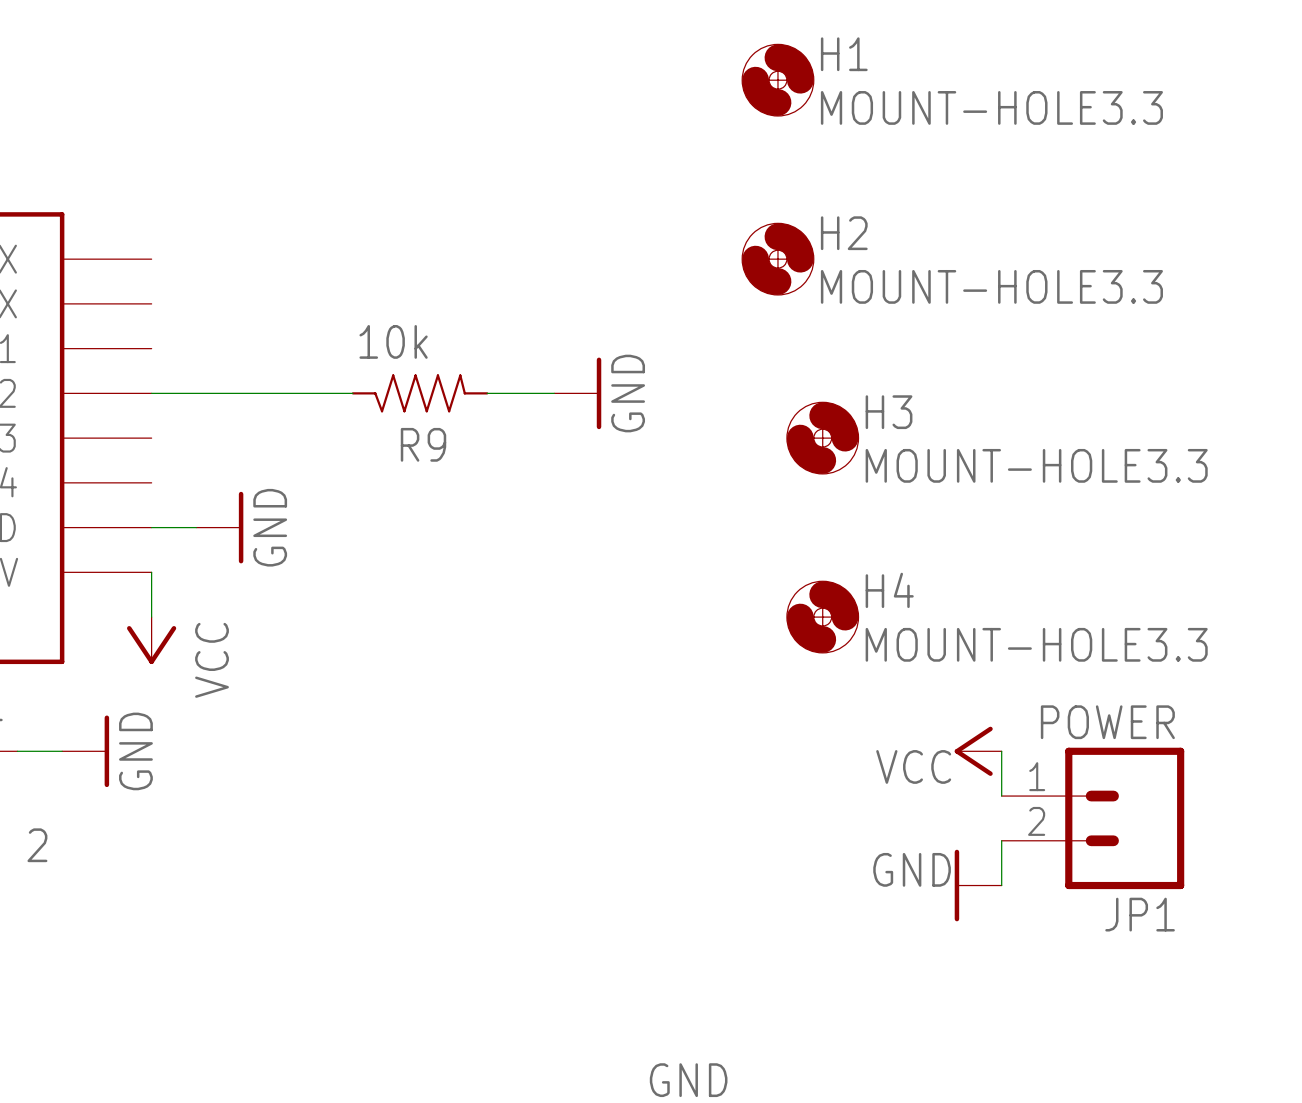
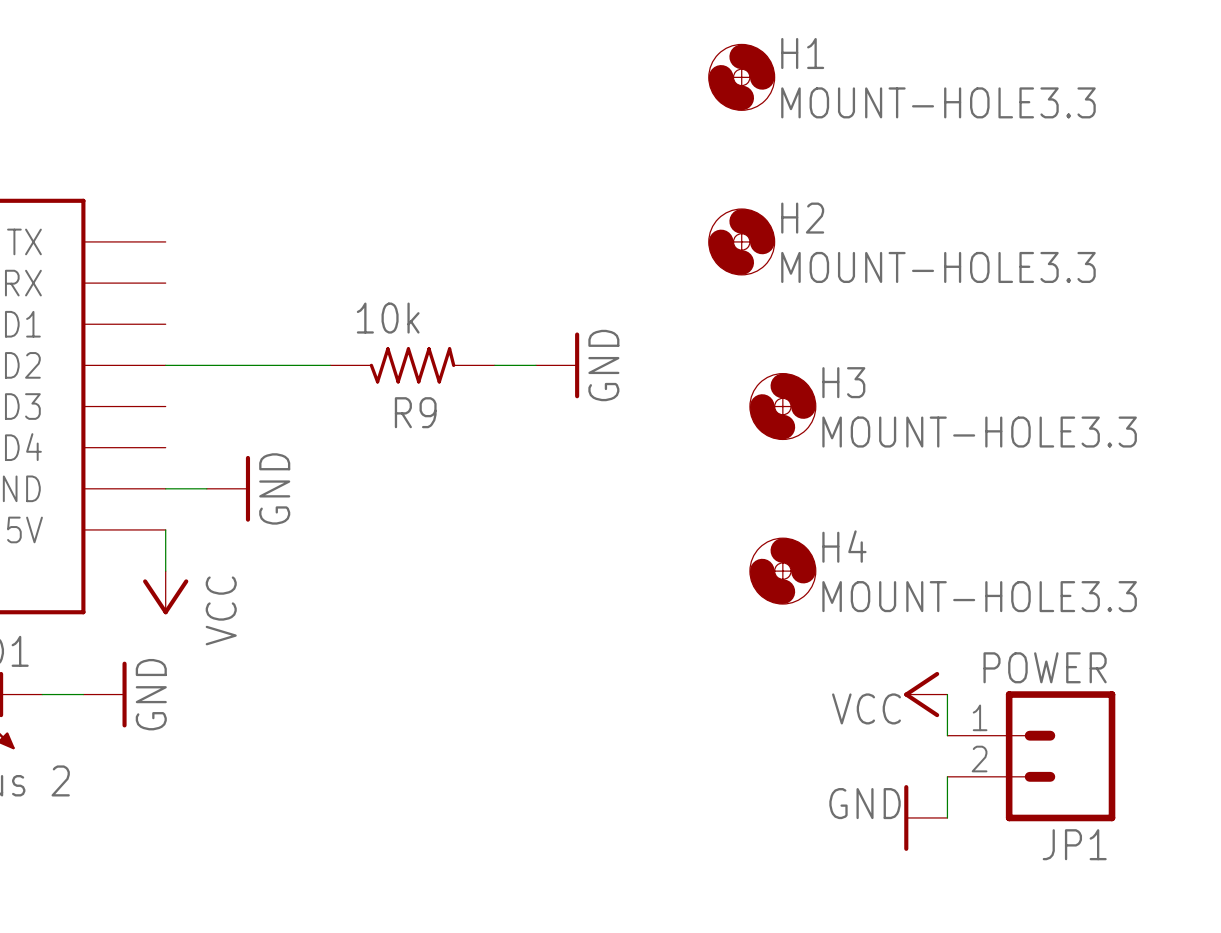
R9 symbol: [351, 374, 489, 413] -> [330, 347, 495, 384]

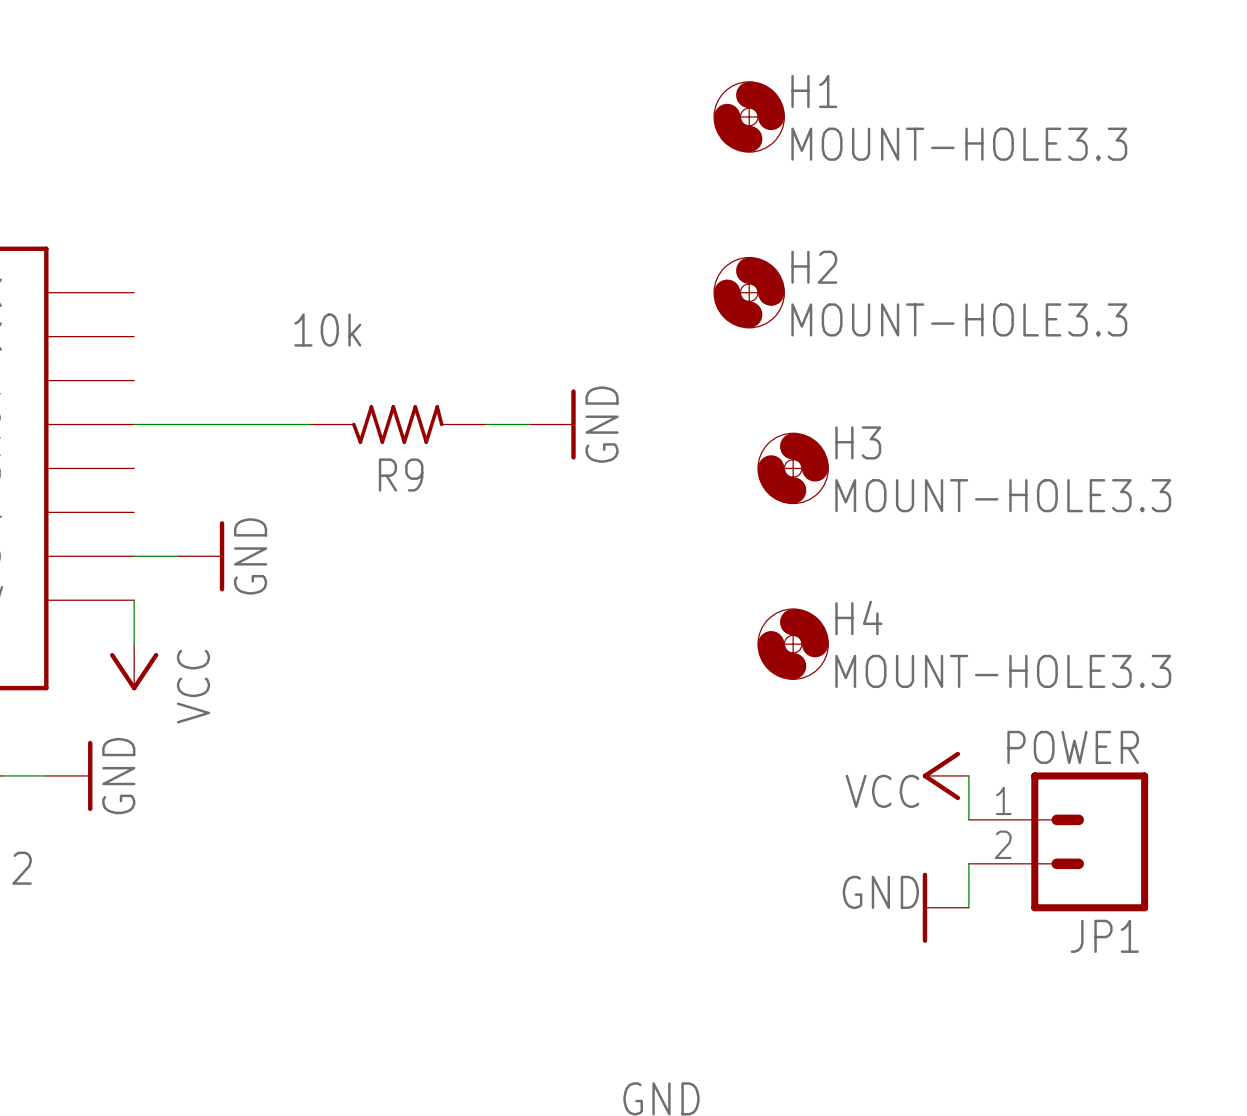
R9 value position: 10k (388, 318) -> 10k (327, 330)

